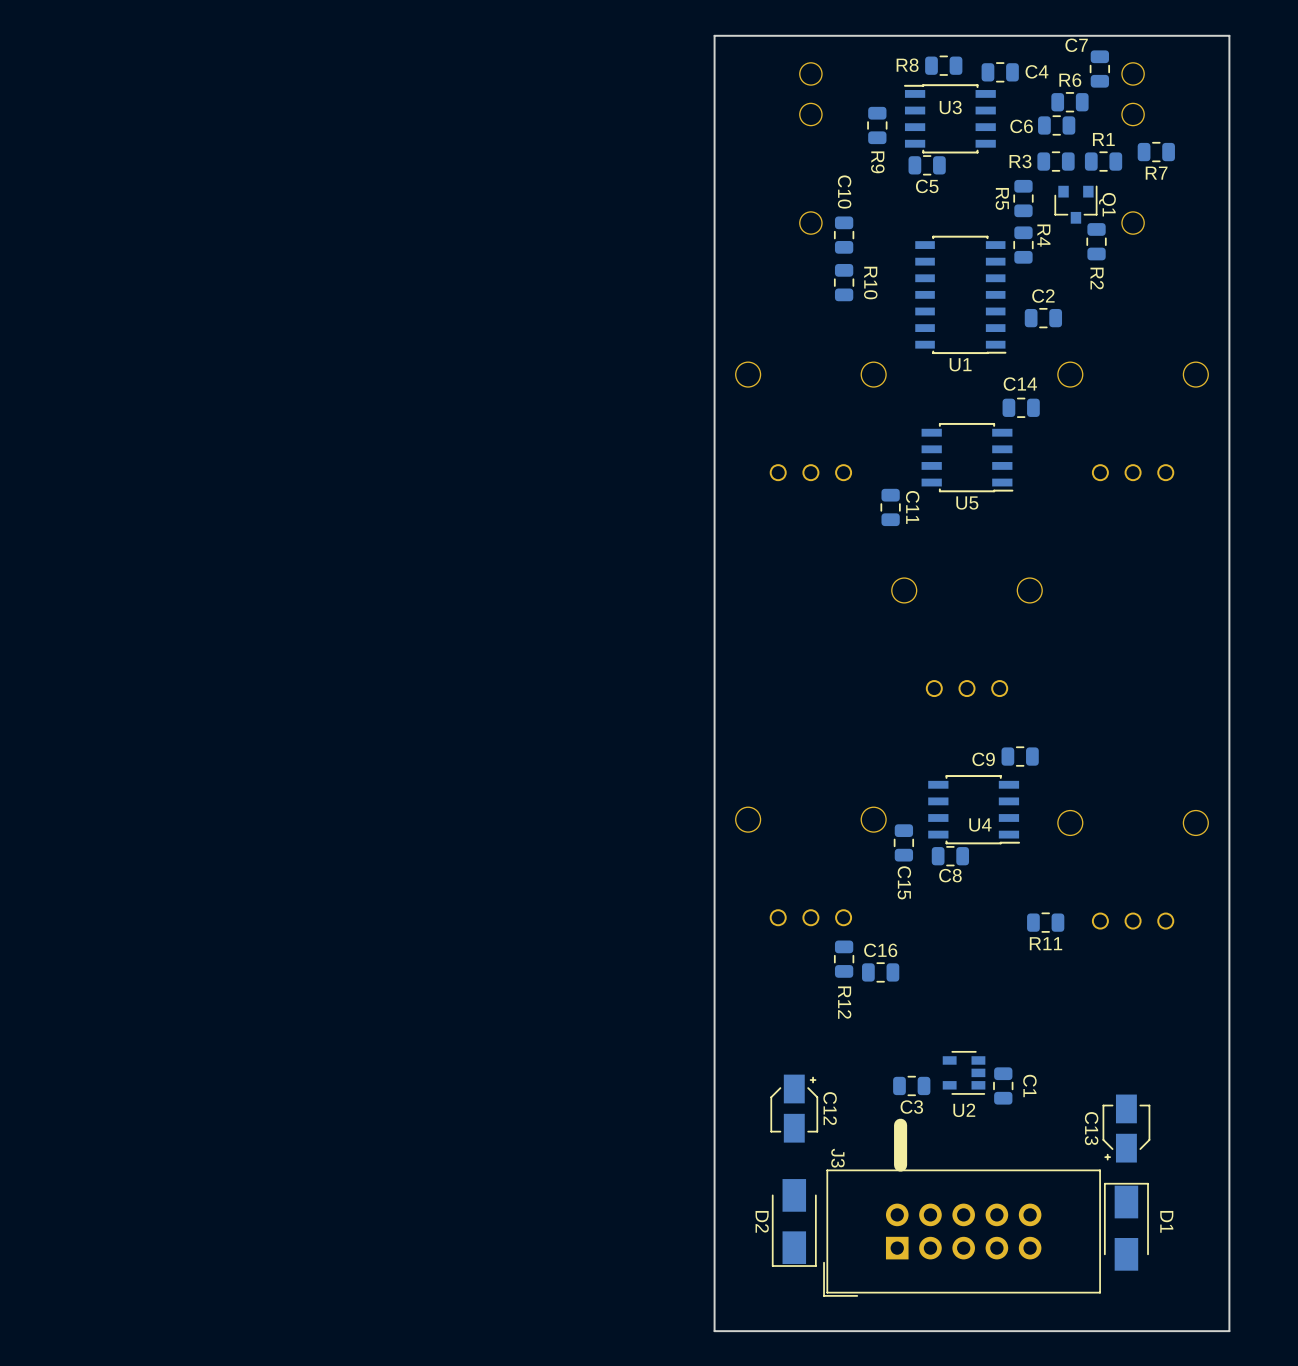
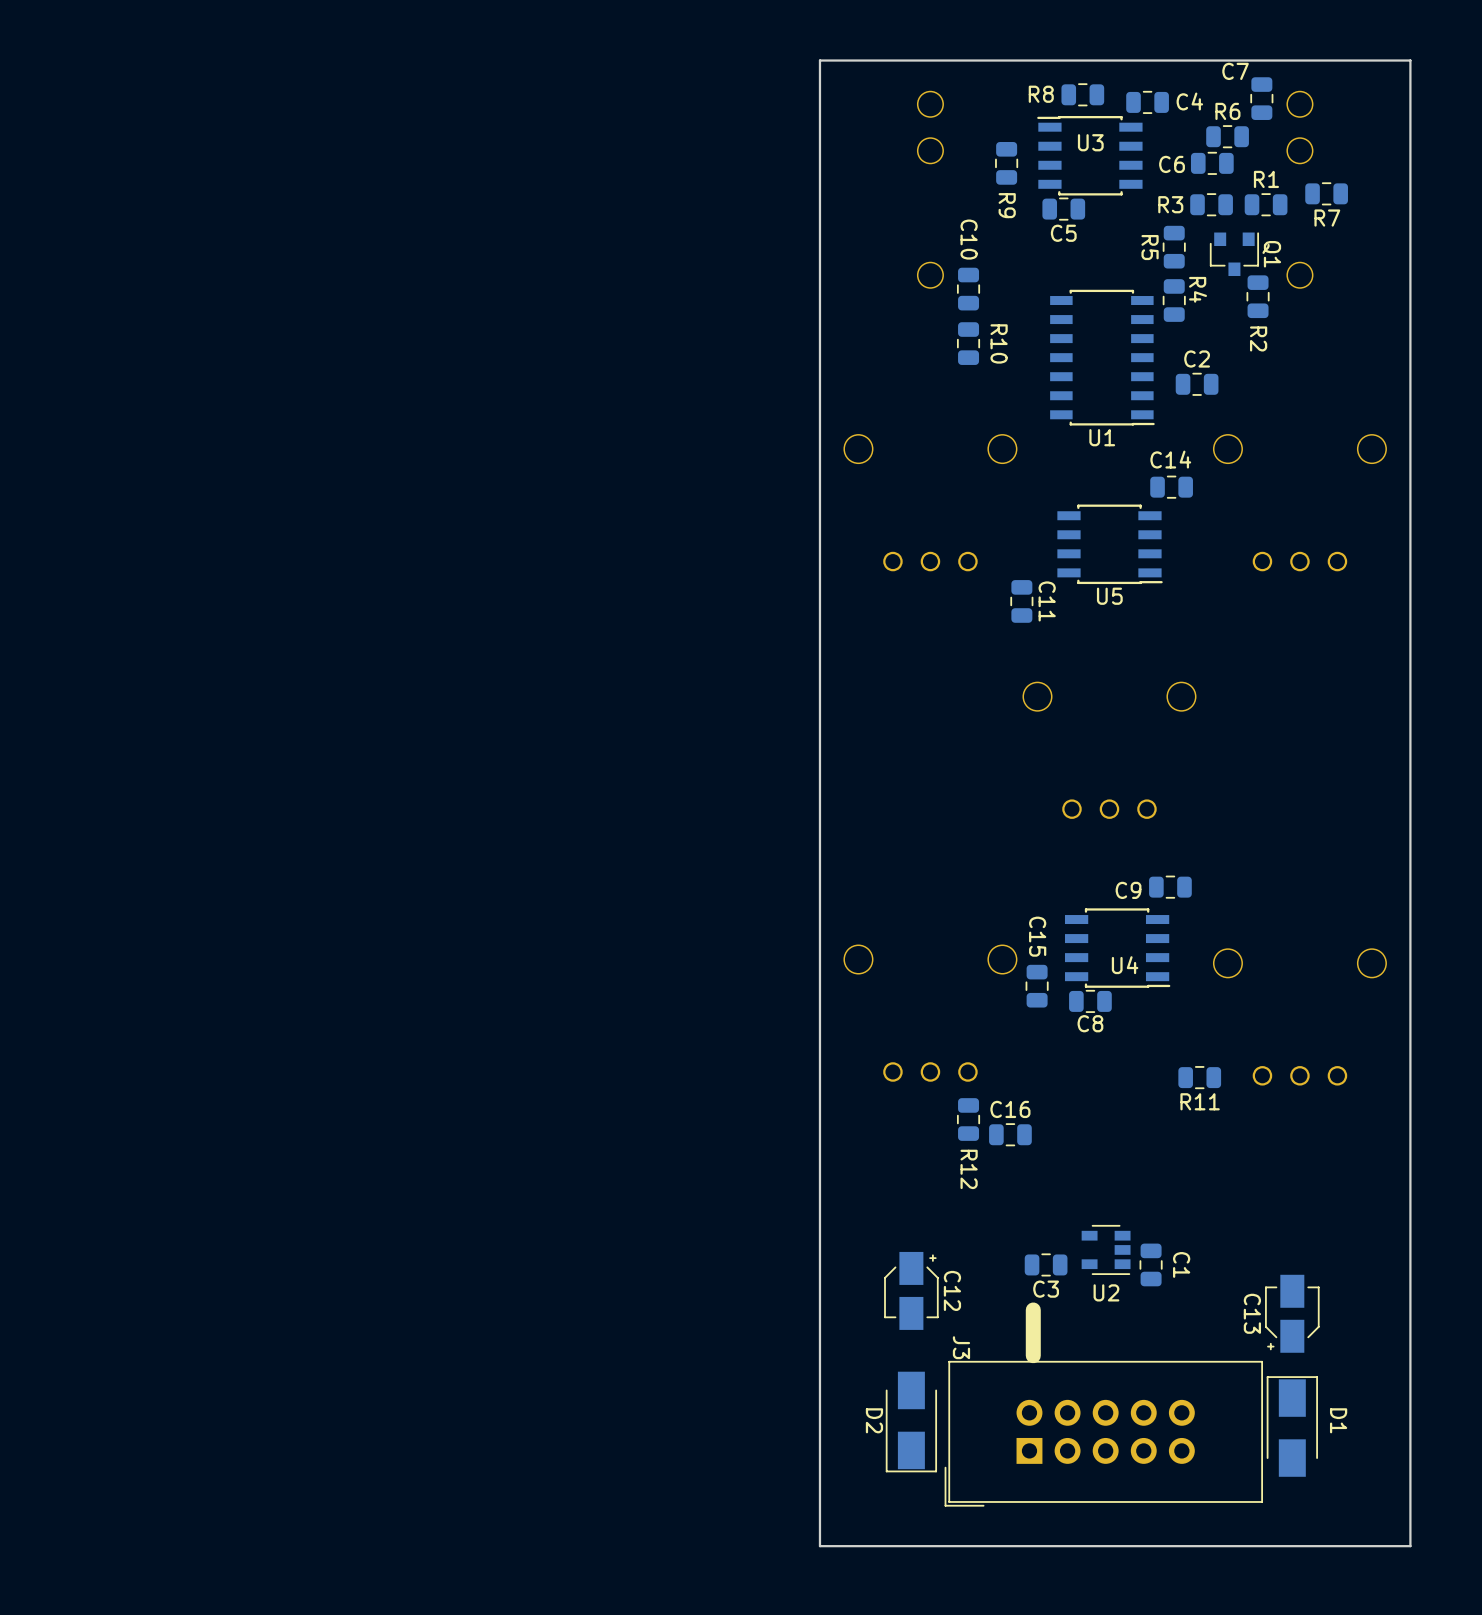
C15 name position: C15 (904, 882) -> C15 (1037, 936)

